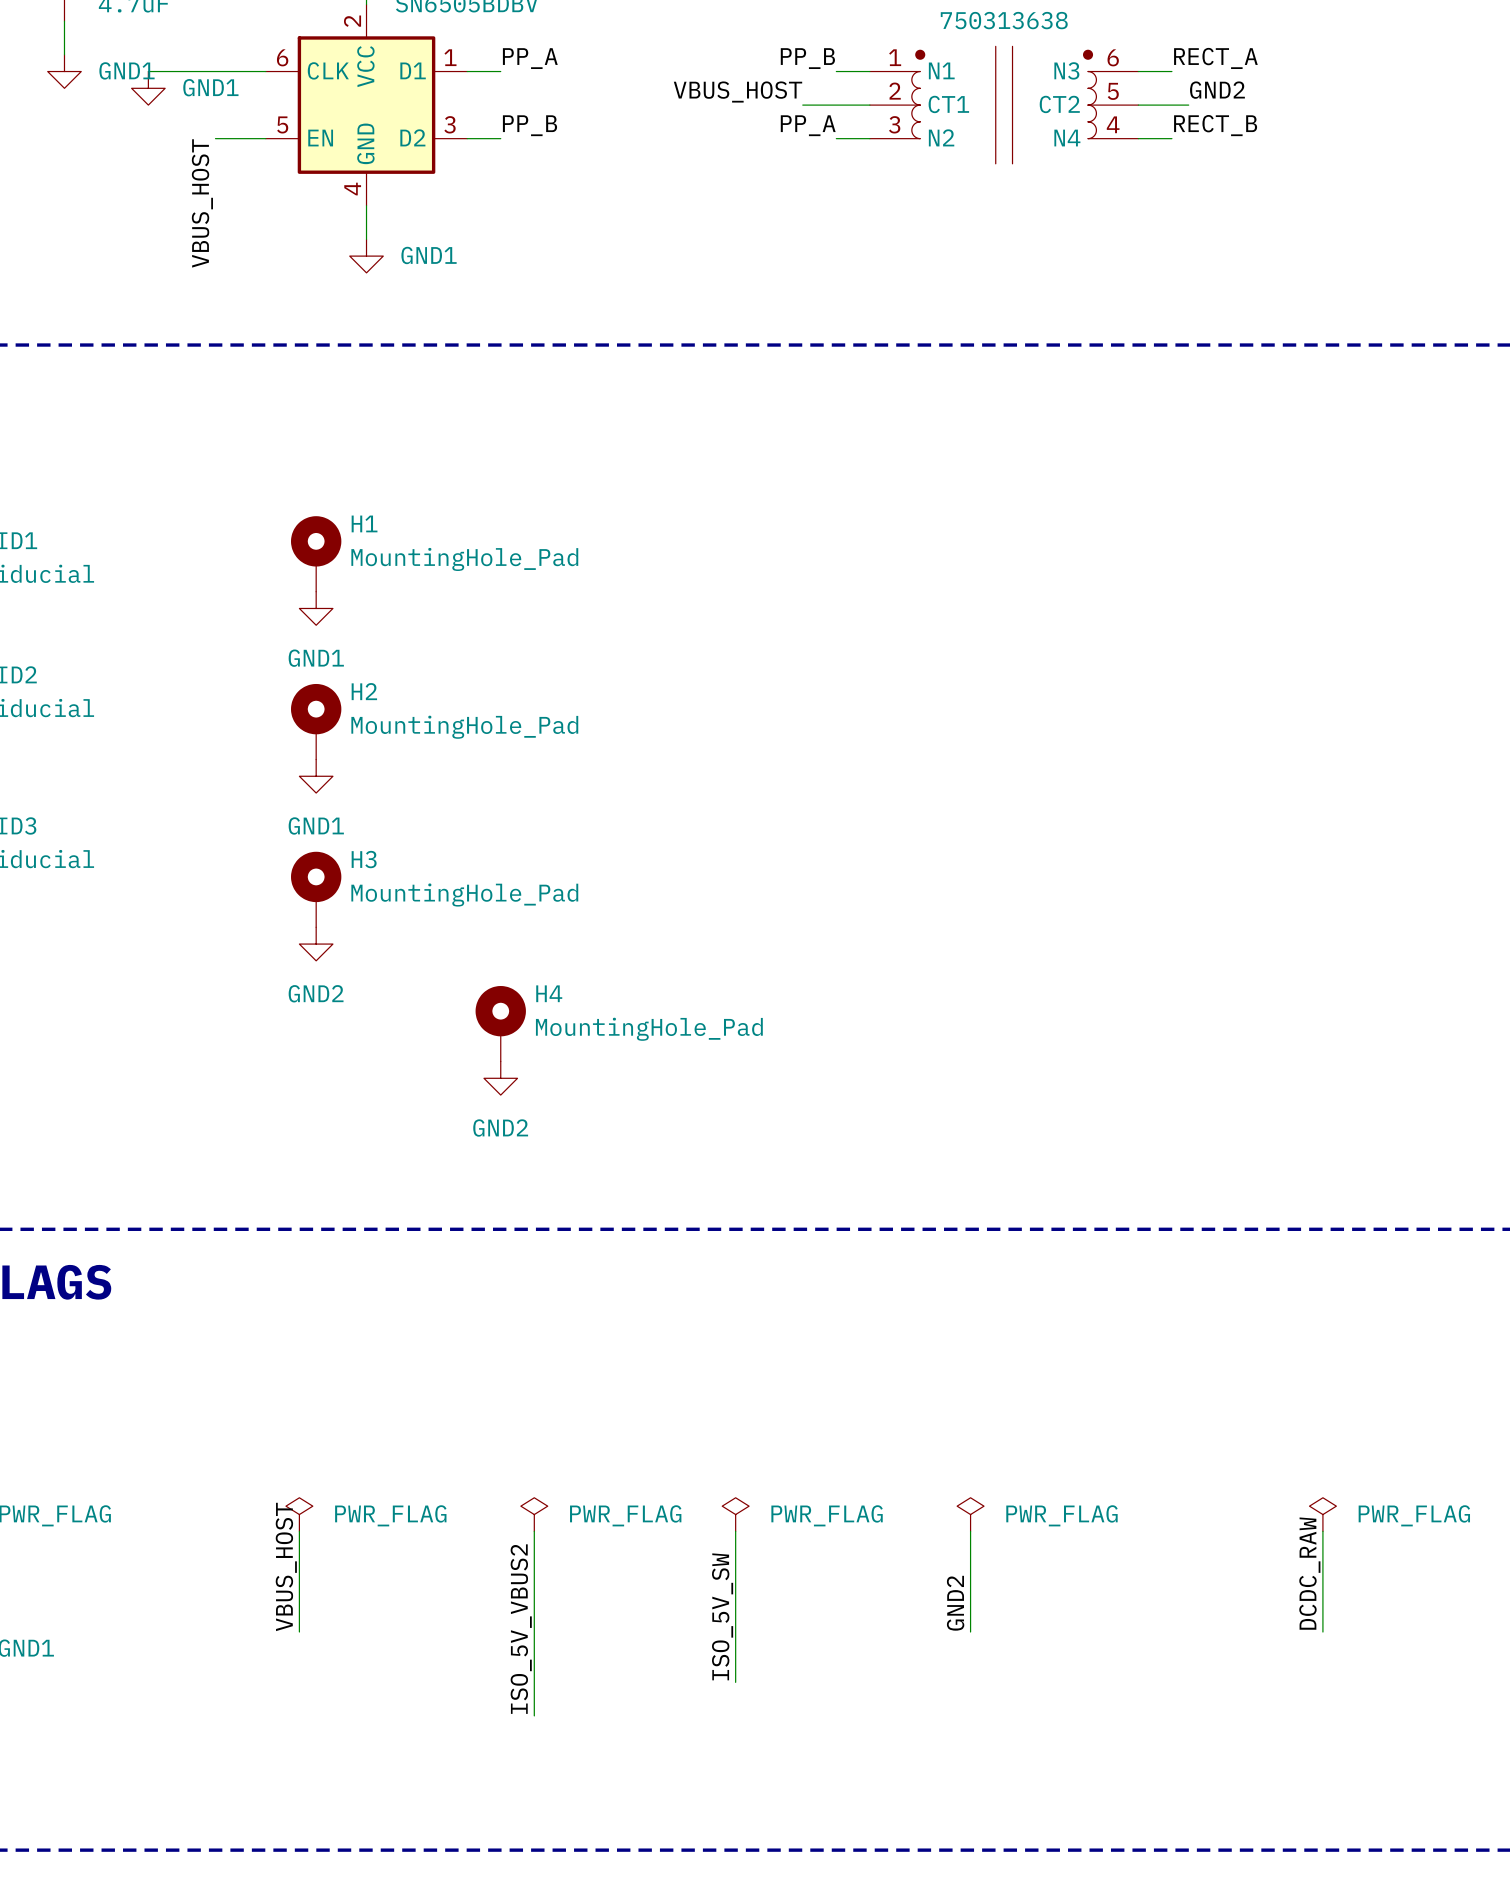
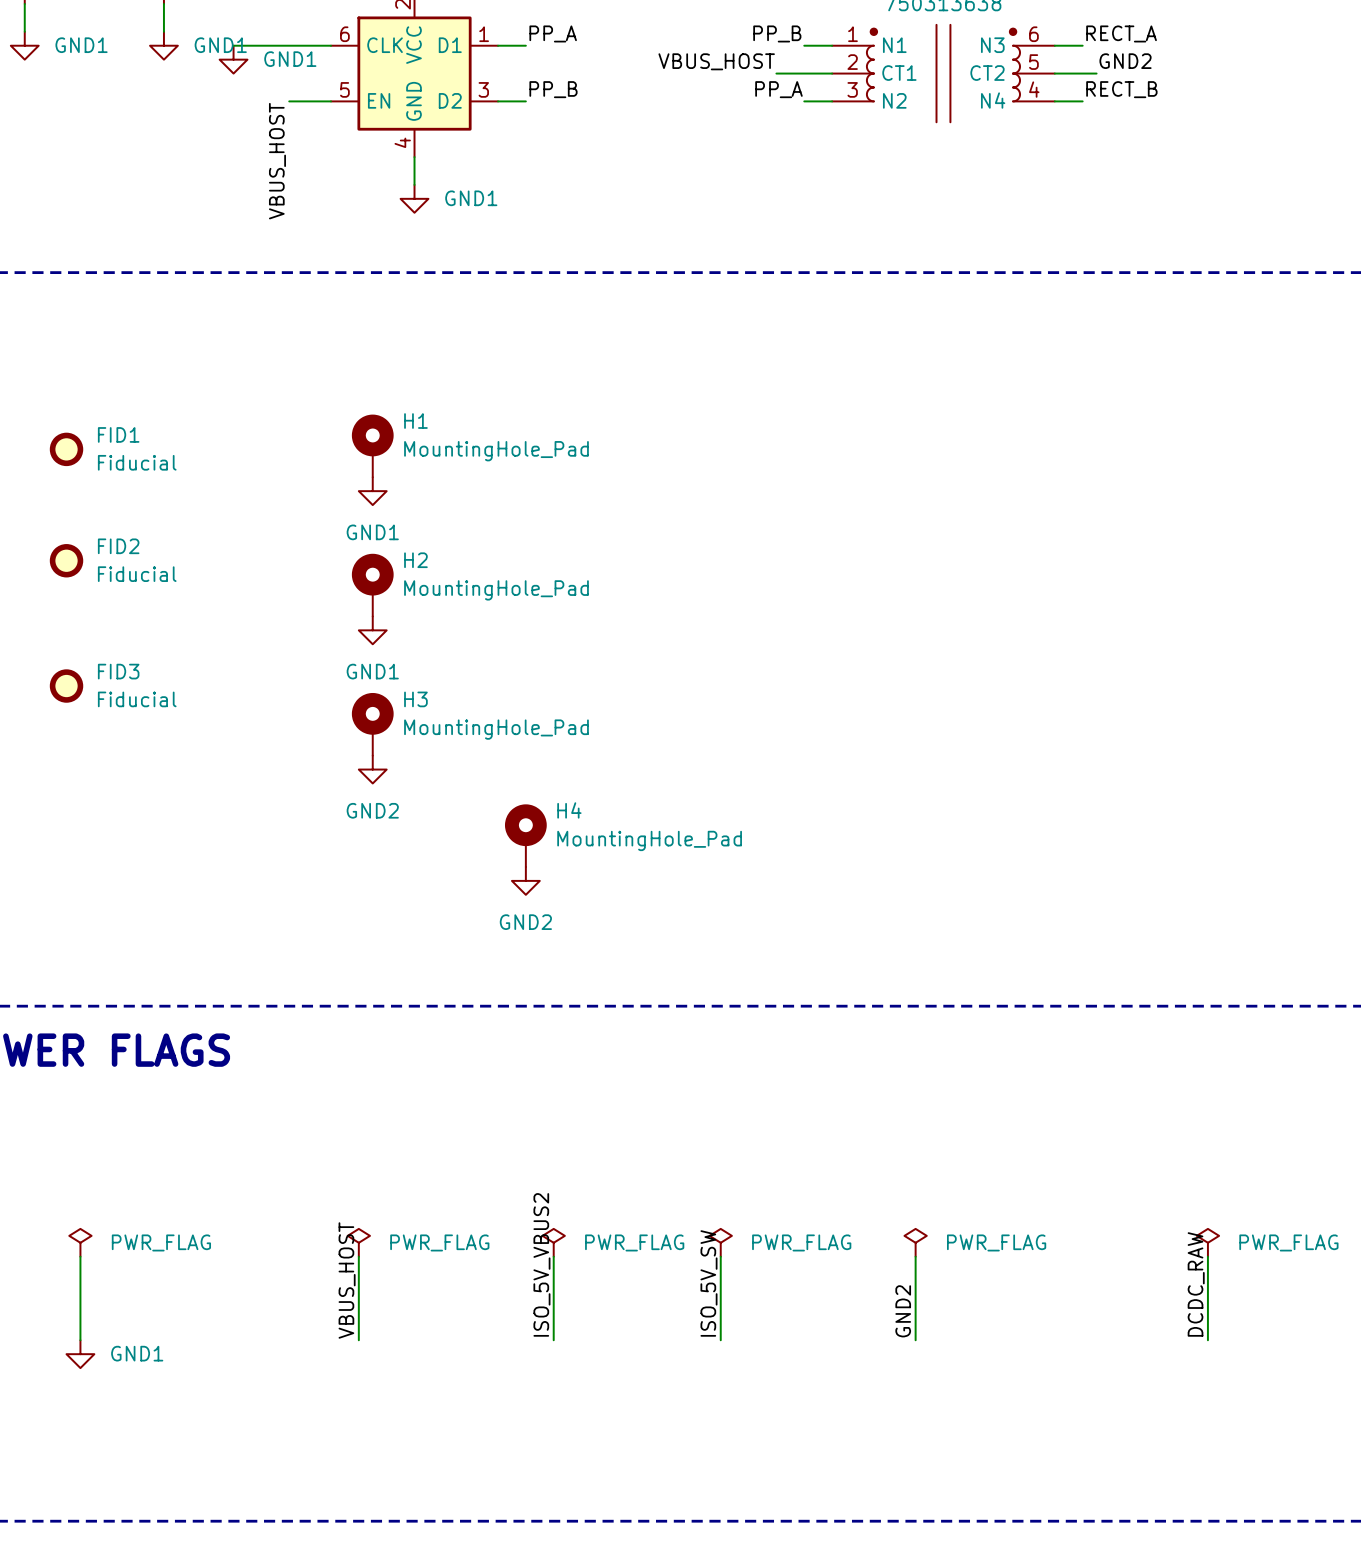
label position: ISO_5V_SW (722, 1616) -> ISO_5V_SW (708, 1283)
label position: ISO_5V_VBUS2 (521, 1629) -> ISO_5V_VBUS2 (541, 1264)
wire: (534, 1632) (534, 1715) -> none
wire: (735, 1632) (735, 1682) -> none

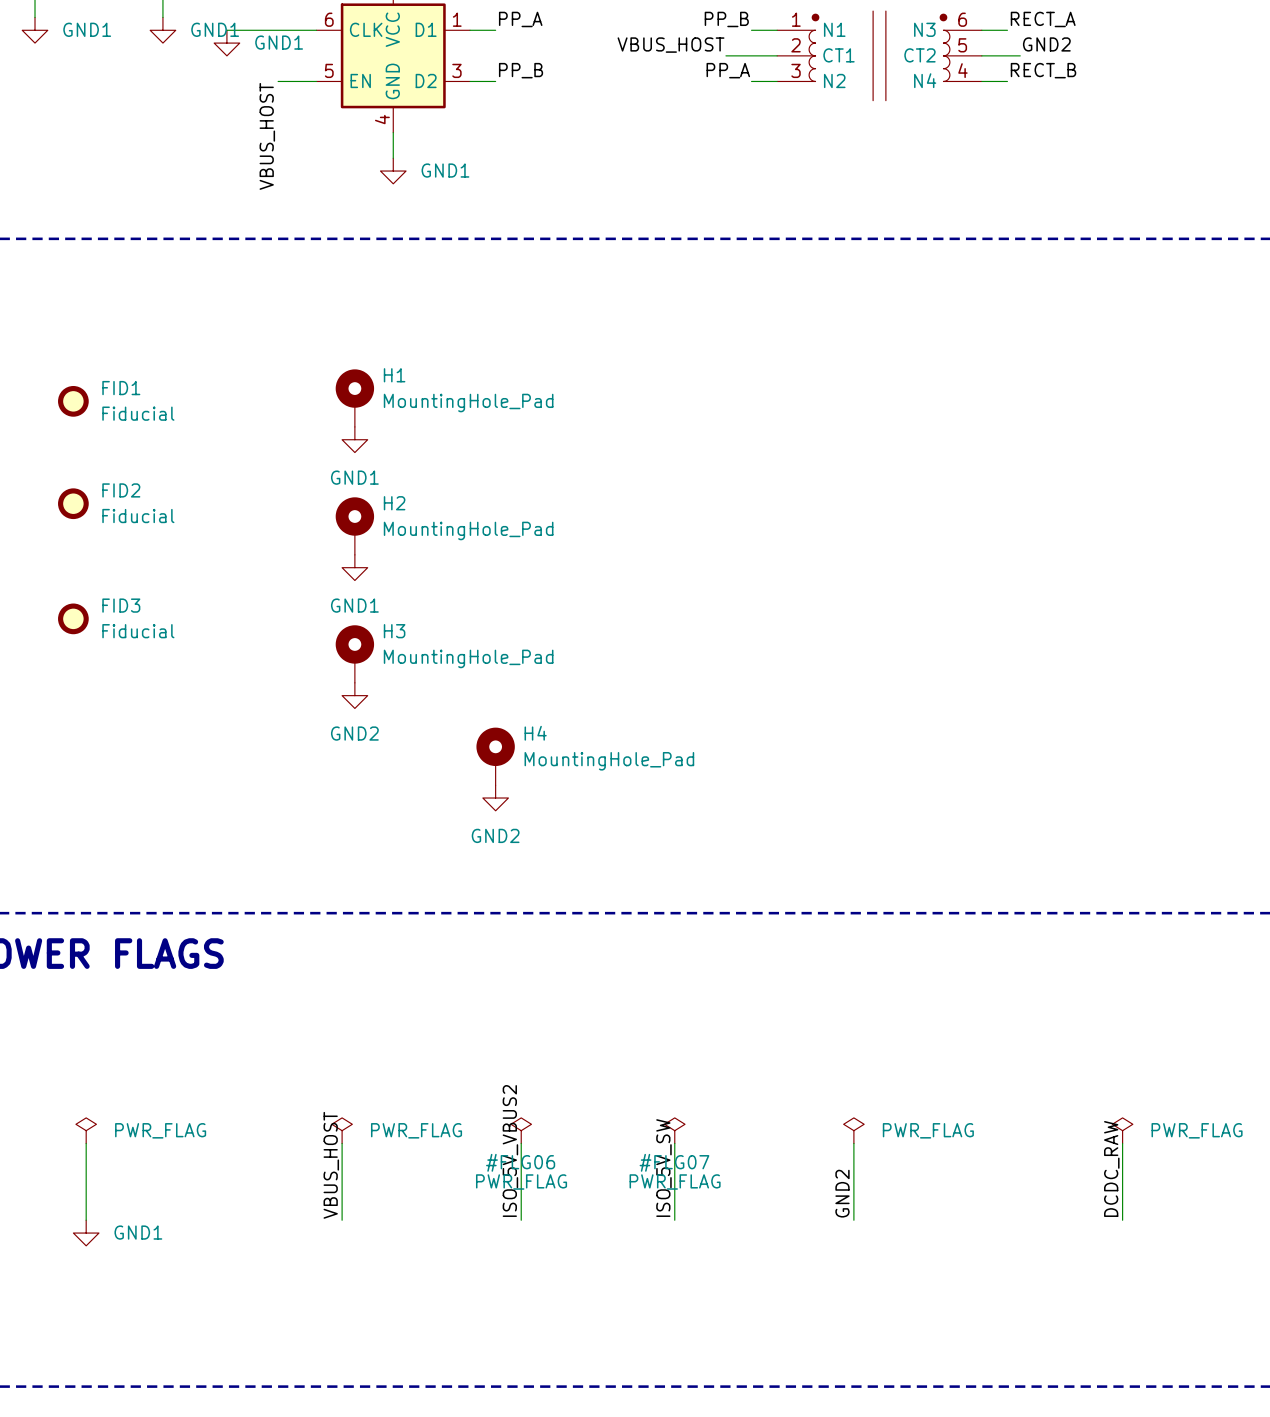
#FLG06 text position: PWR_FLAG (634, 1242) -> PWR_FLAG (521, 1182)
#FLG07 text position: PWR_FLAG (801, 1242) -> PWR_FLAG (675, 1182)
#FLG06 name: none -> #FLG06 (520, 1162)
#FLG07 name: none -> #FLG07 (674, 1162)

